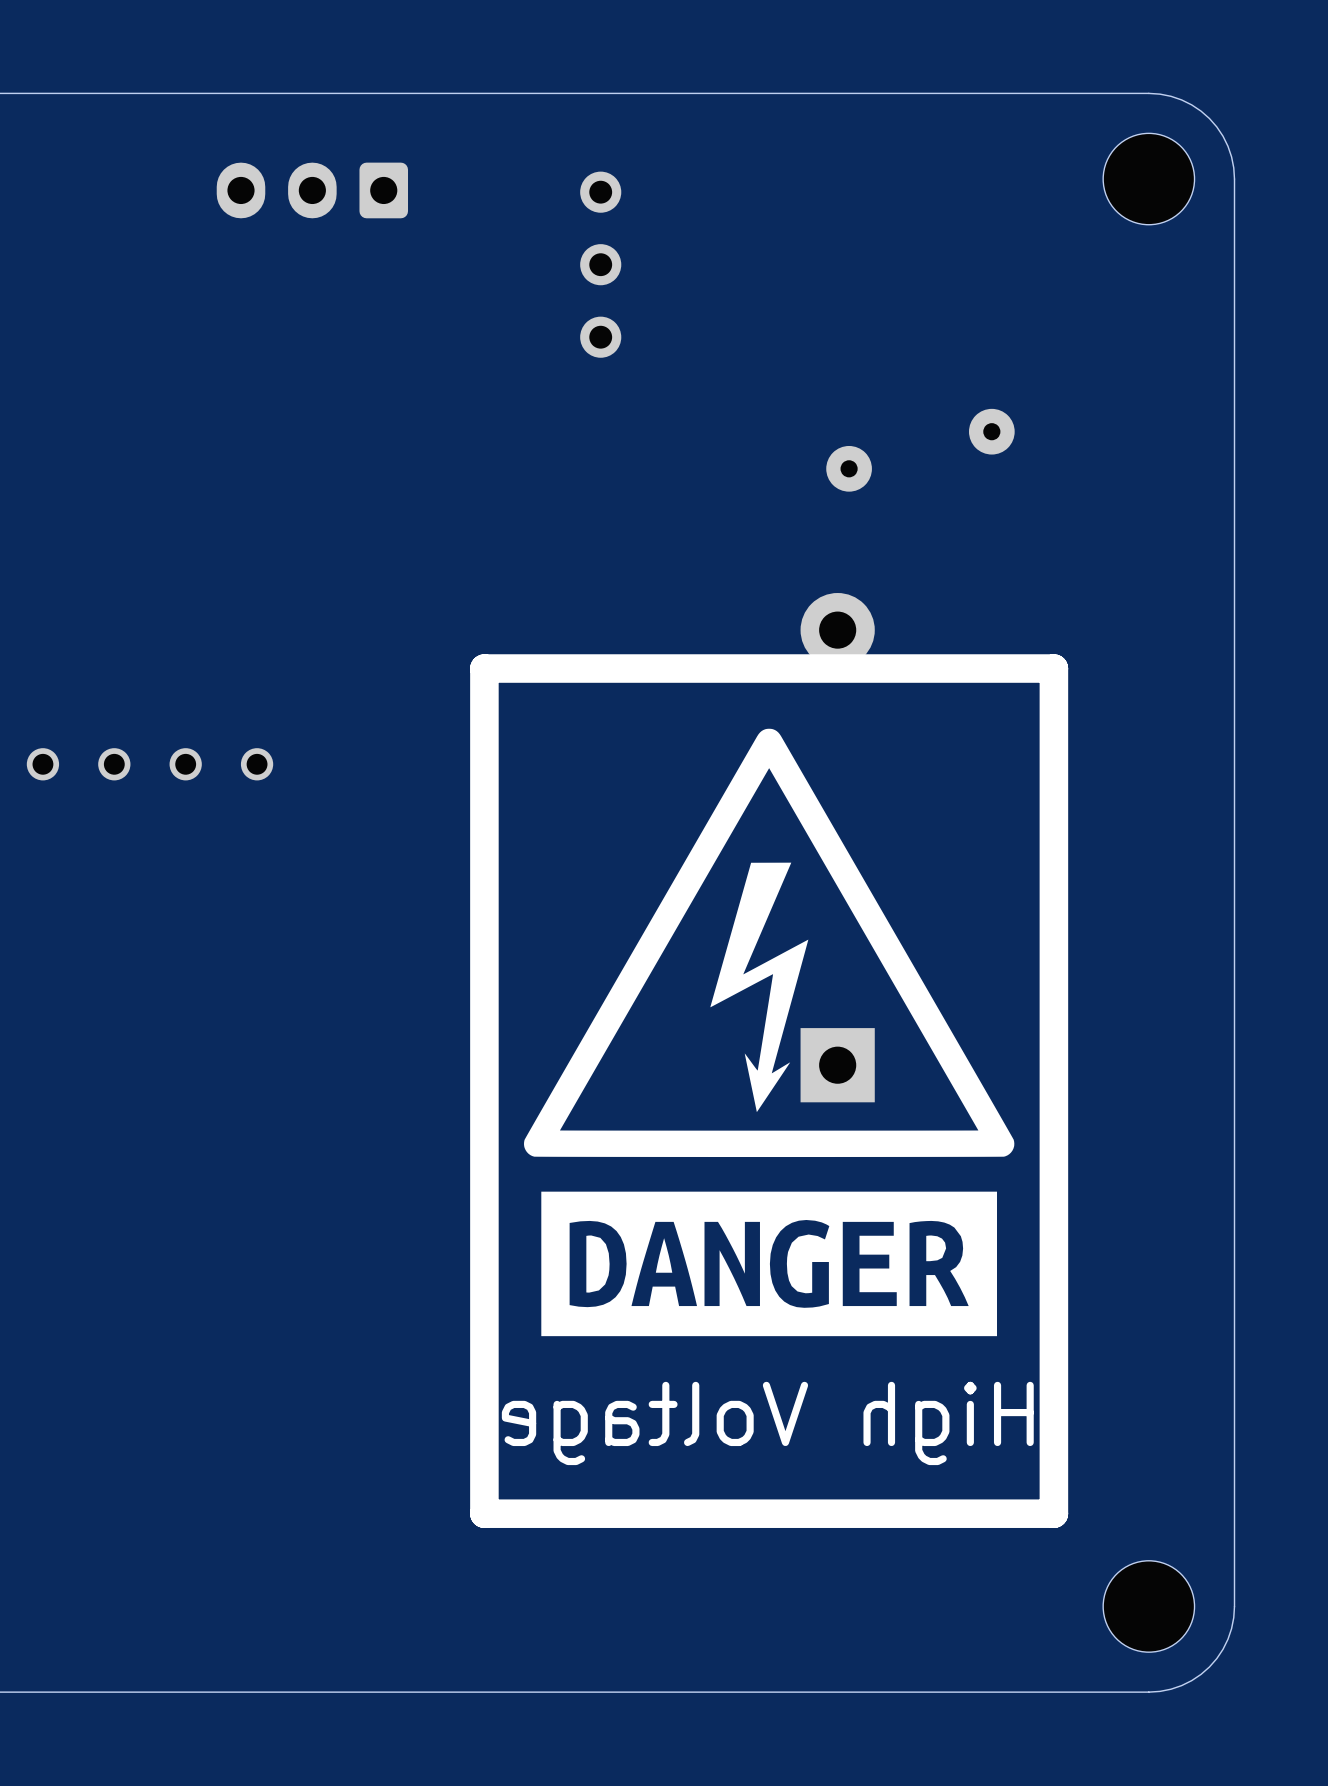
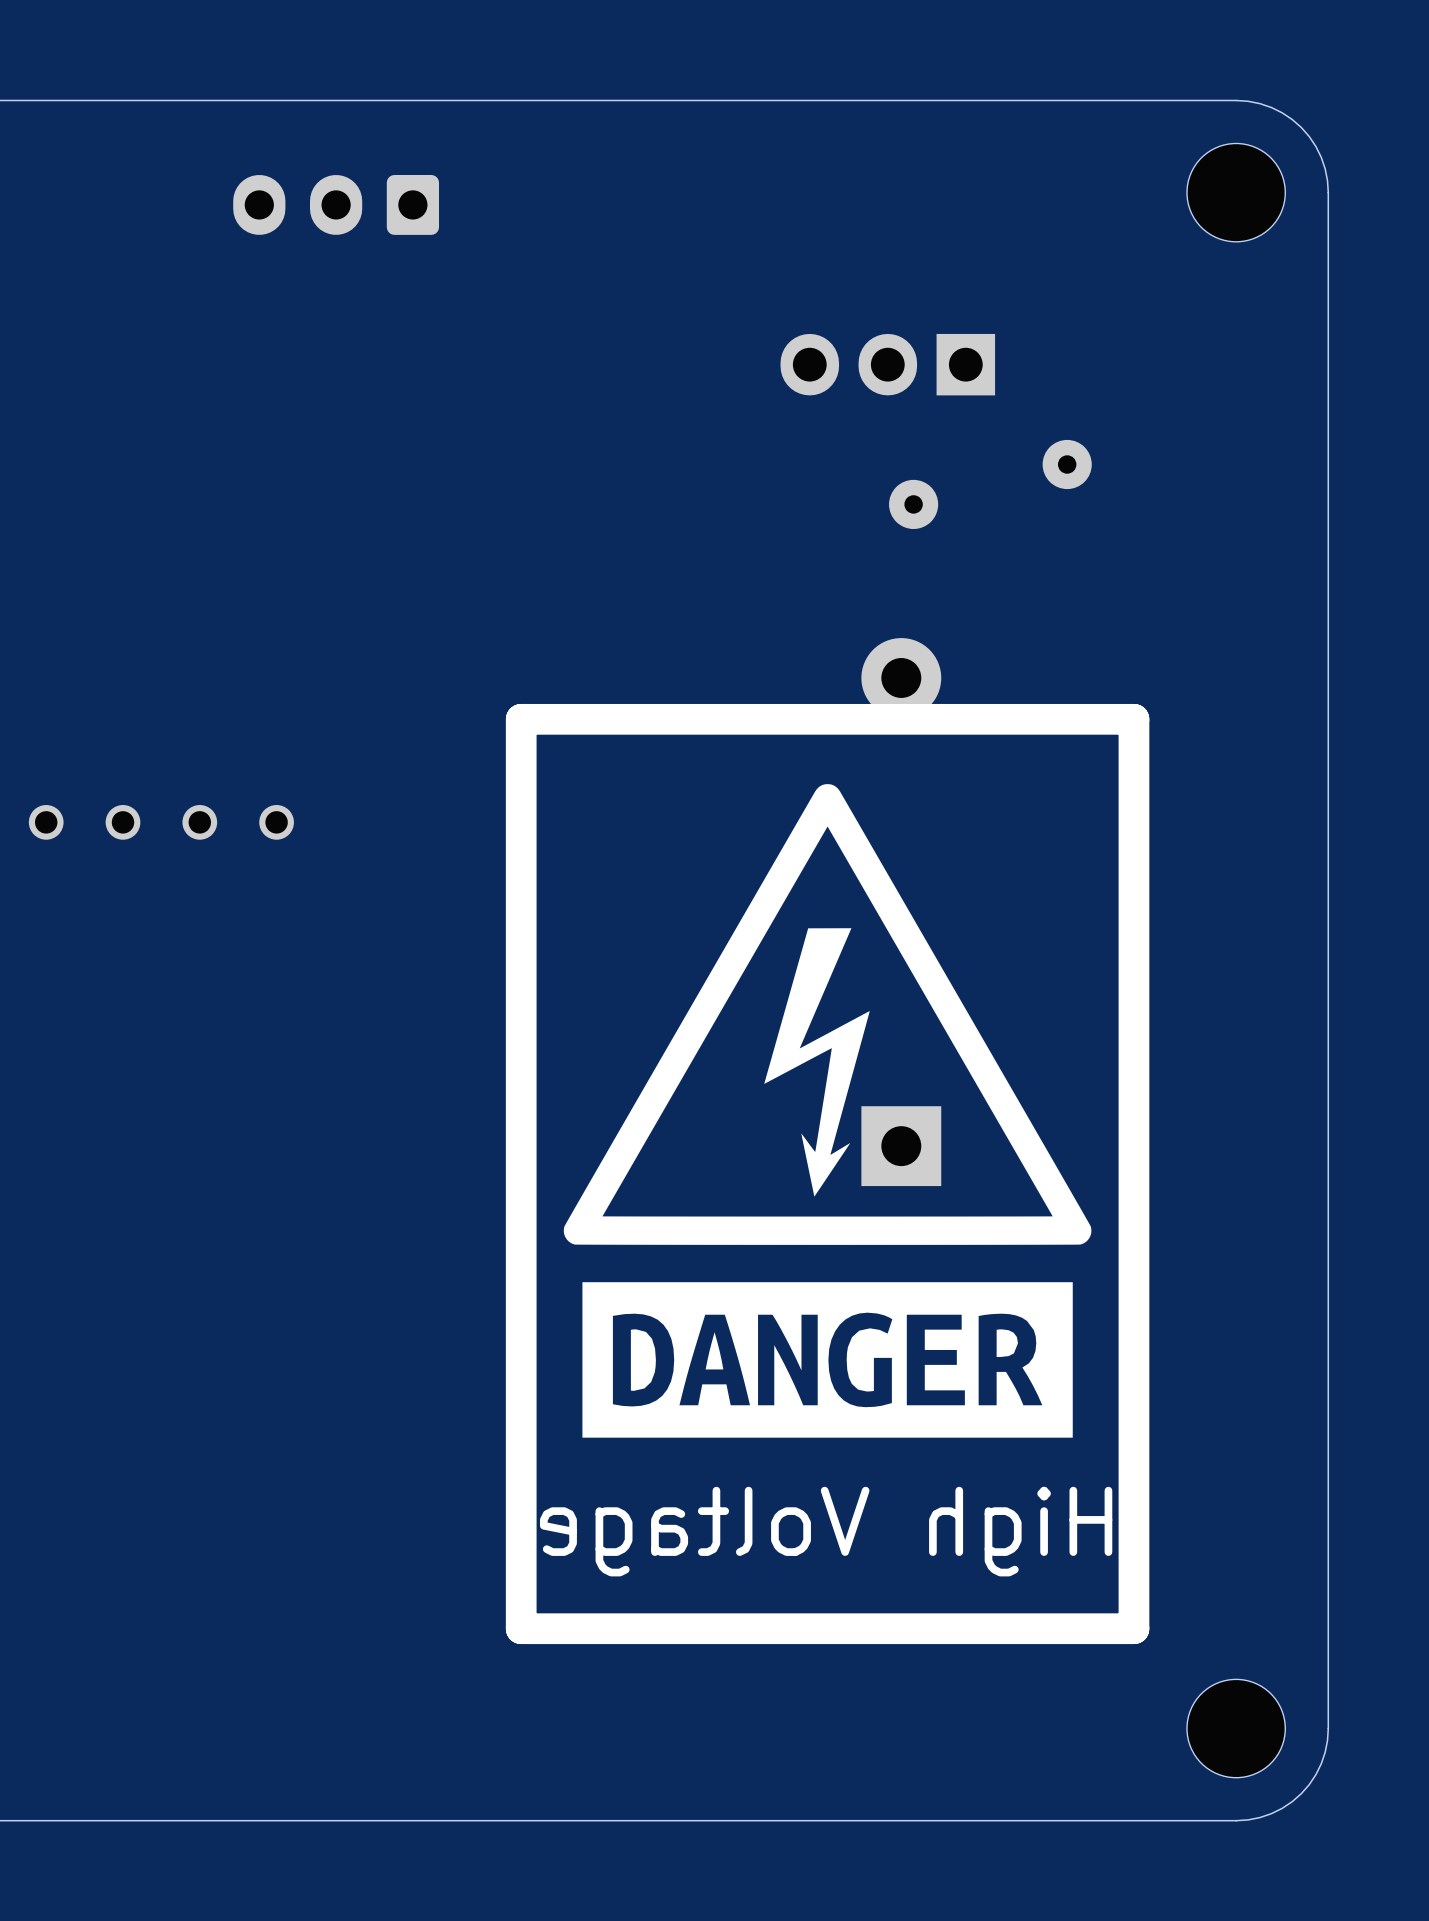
part: (600, 264) -> none
part: none -> (887, 364)

